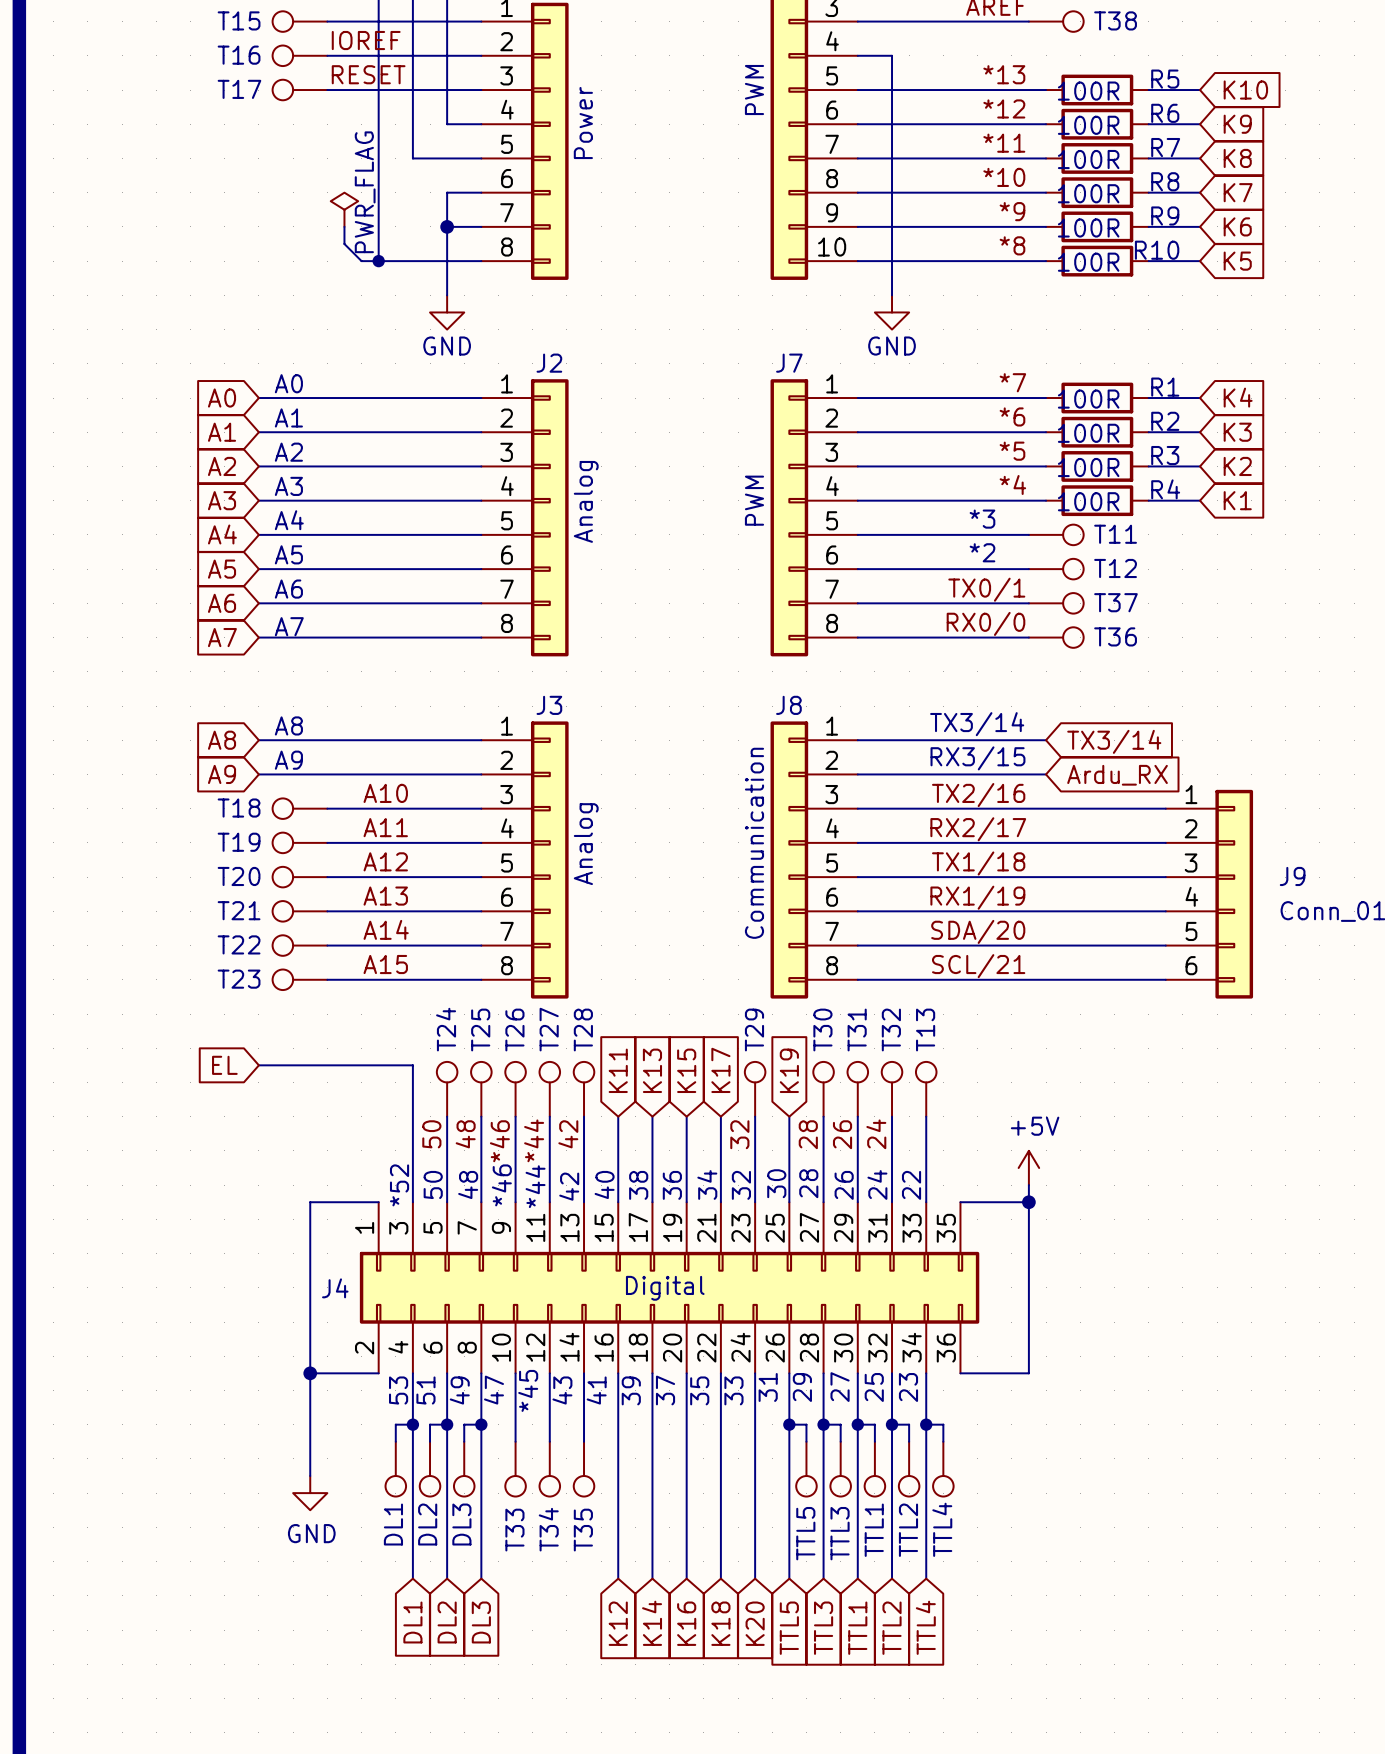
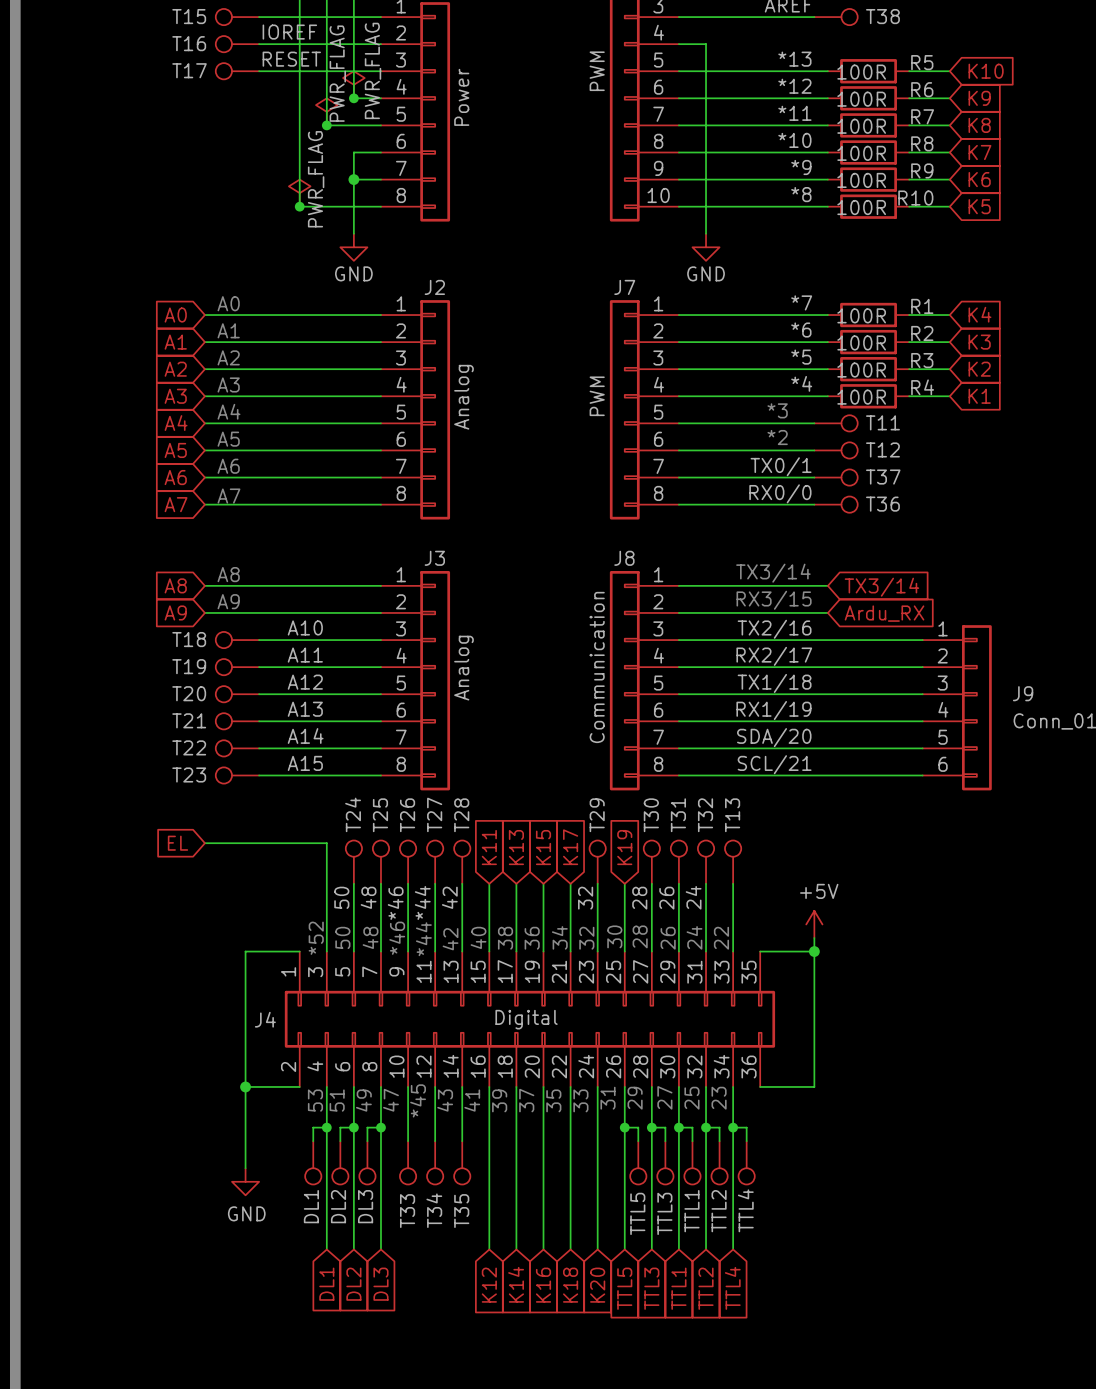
power symbol: none -> PWR_FLAG (353, 84)
junction: none -> (353, 98)
power symbol: none -> PWR_FLAG (326, 111)
junction: none -> (326, 125)
power symbol: PWR_FLAG (344, 209) -> none
wire: (344, 226) (344, 244) (361, 261) (378, 261) -> none
power symbol: none -> PWR_FLAG (299, 193)

